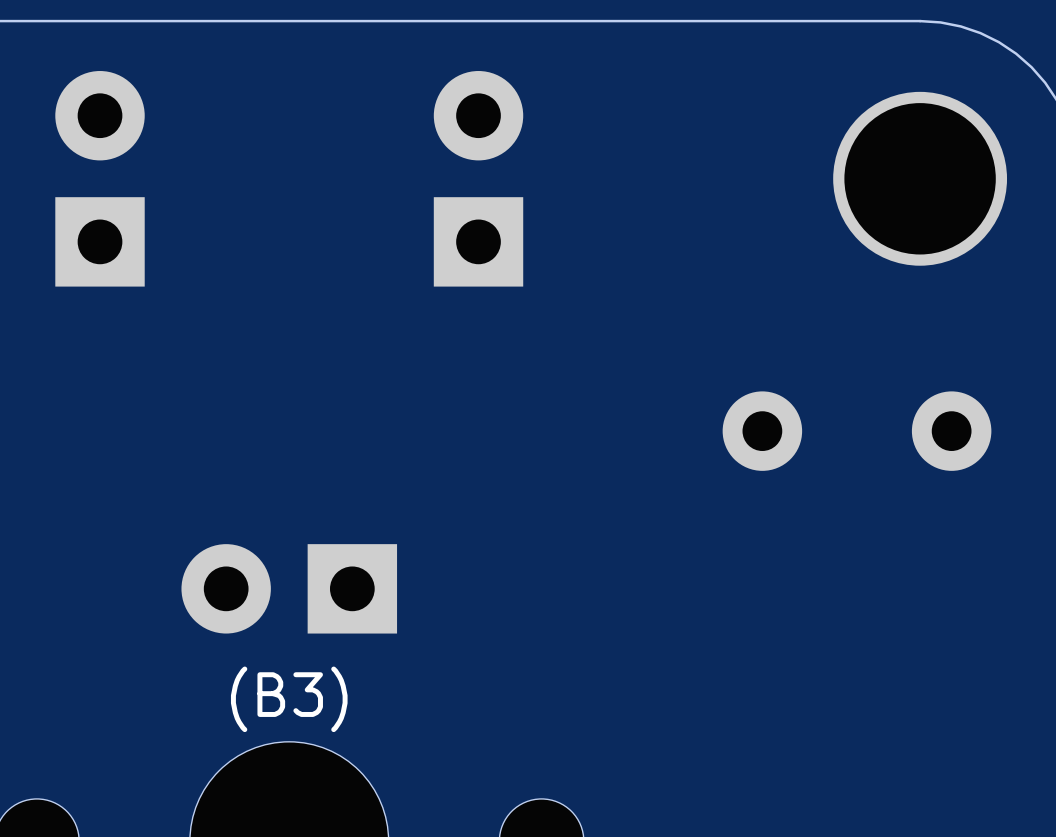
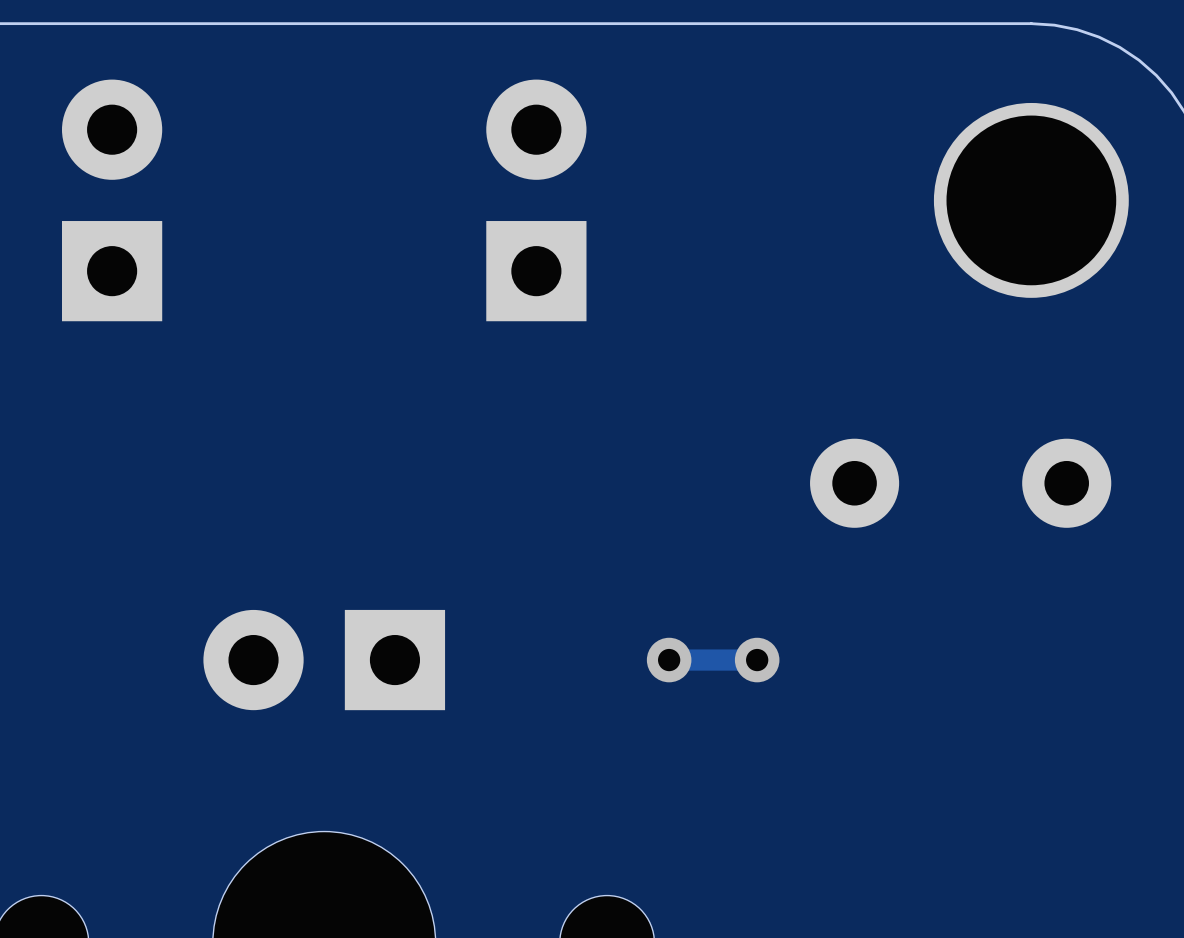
via: none -> (669, 660)
track: none -> (757, 660) (669, 660)
via: none -> (757, 660)
text: (B3) (289, 699) -> none

